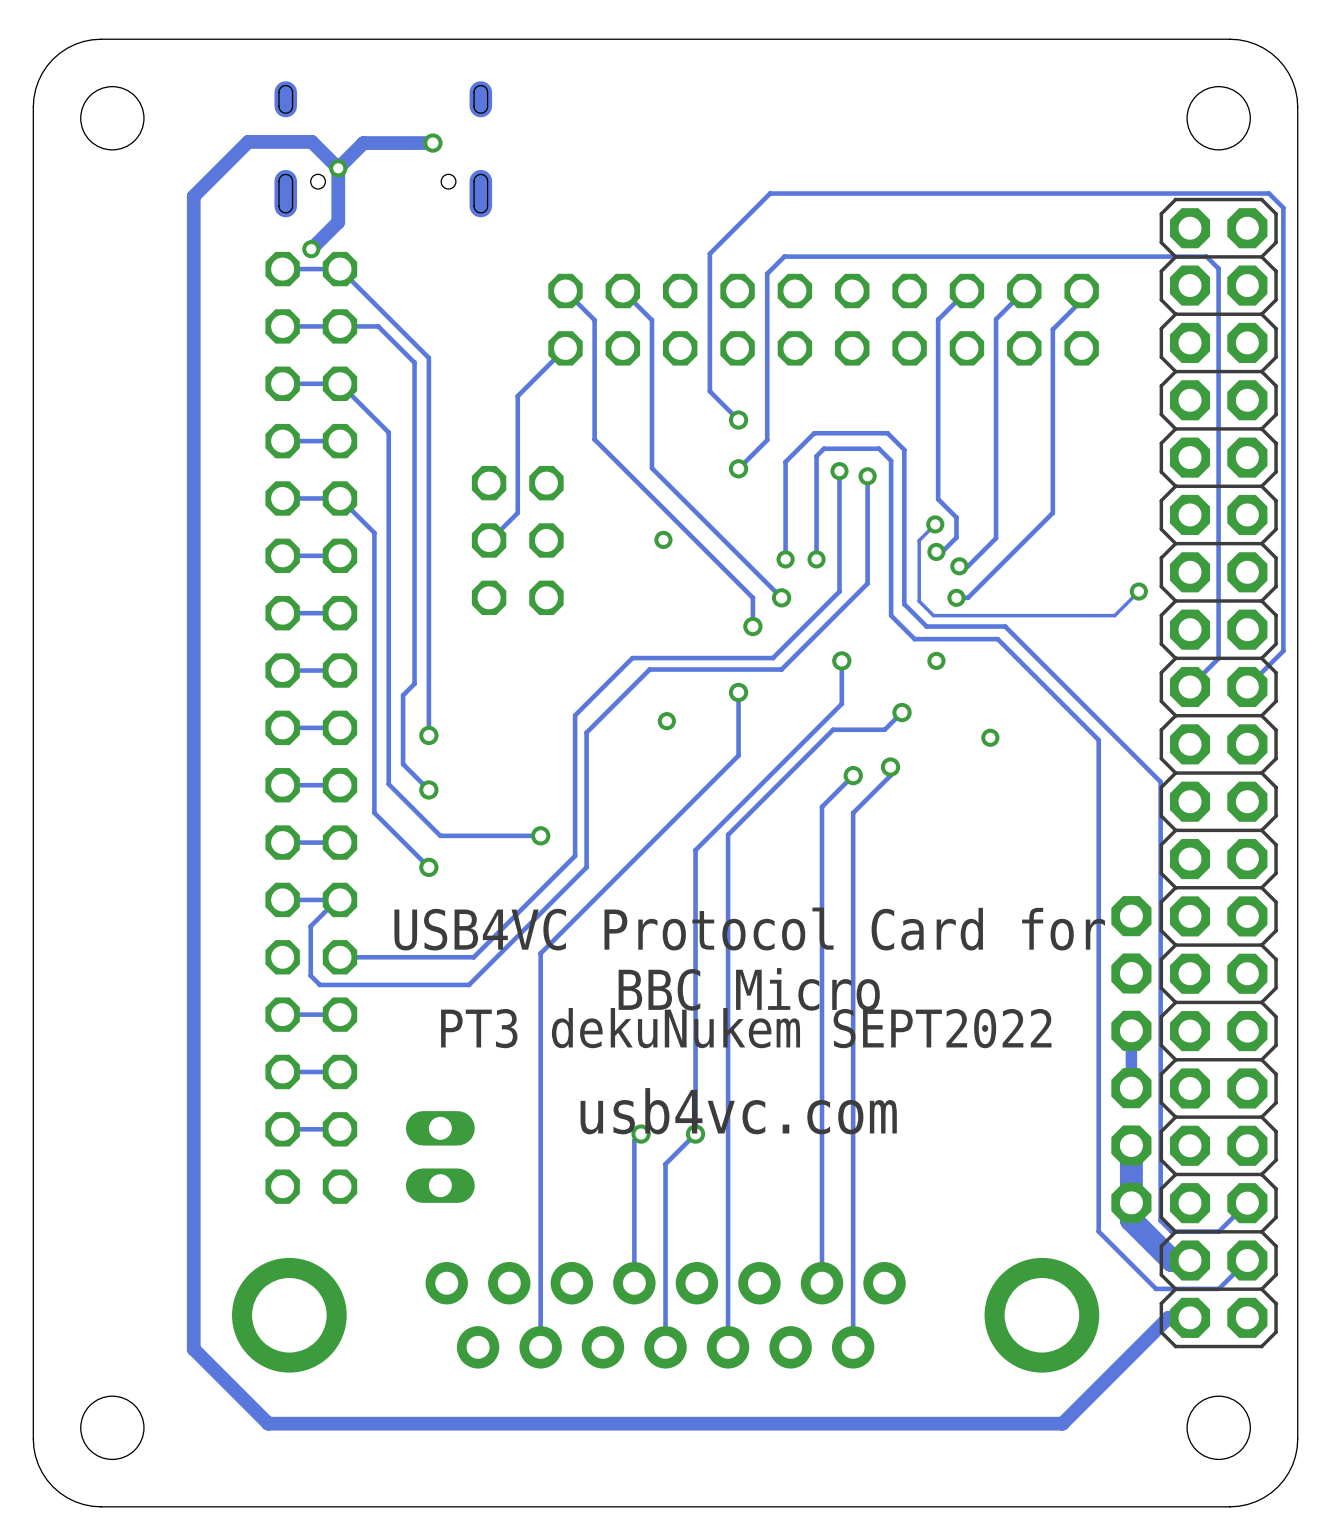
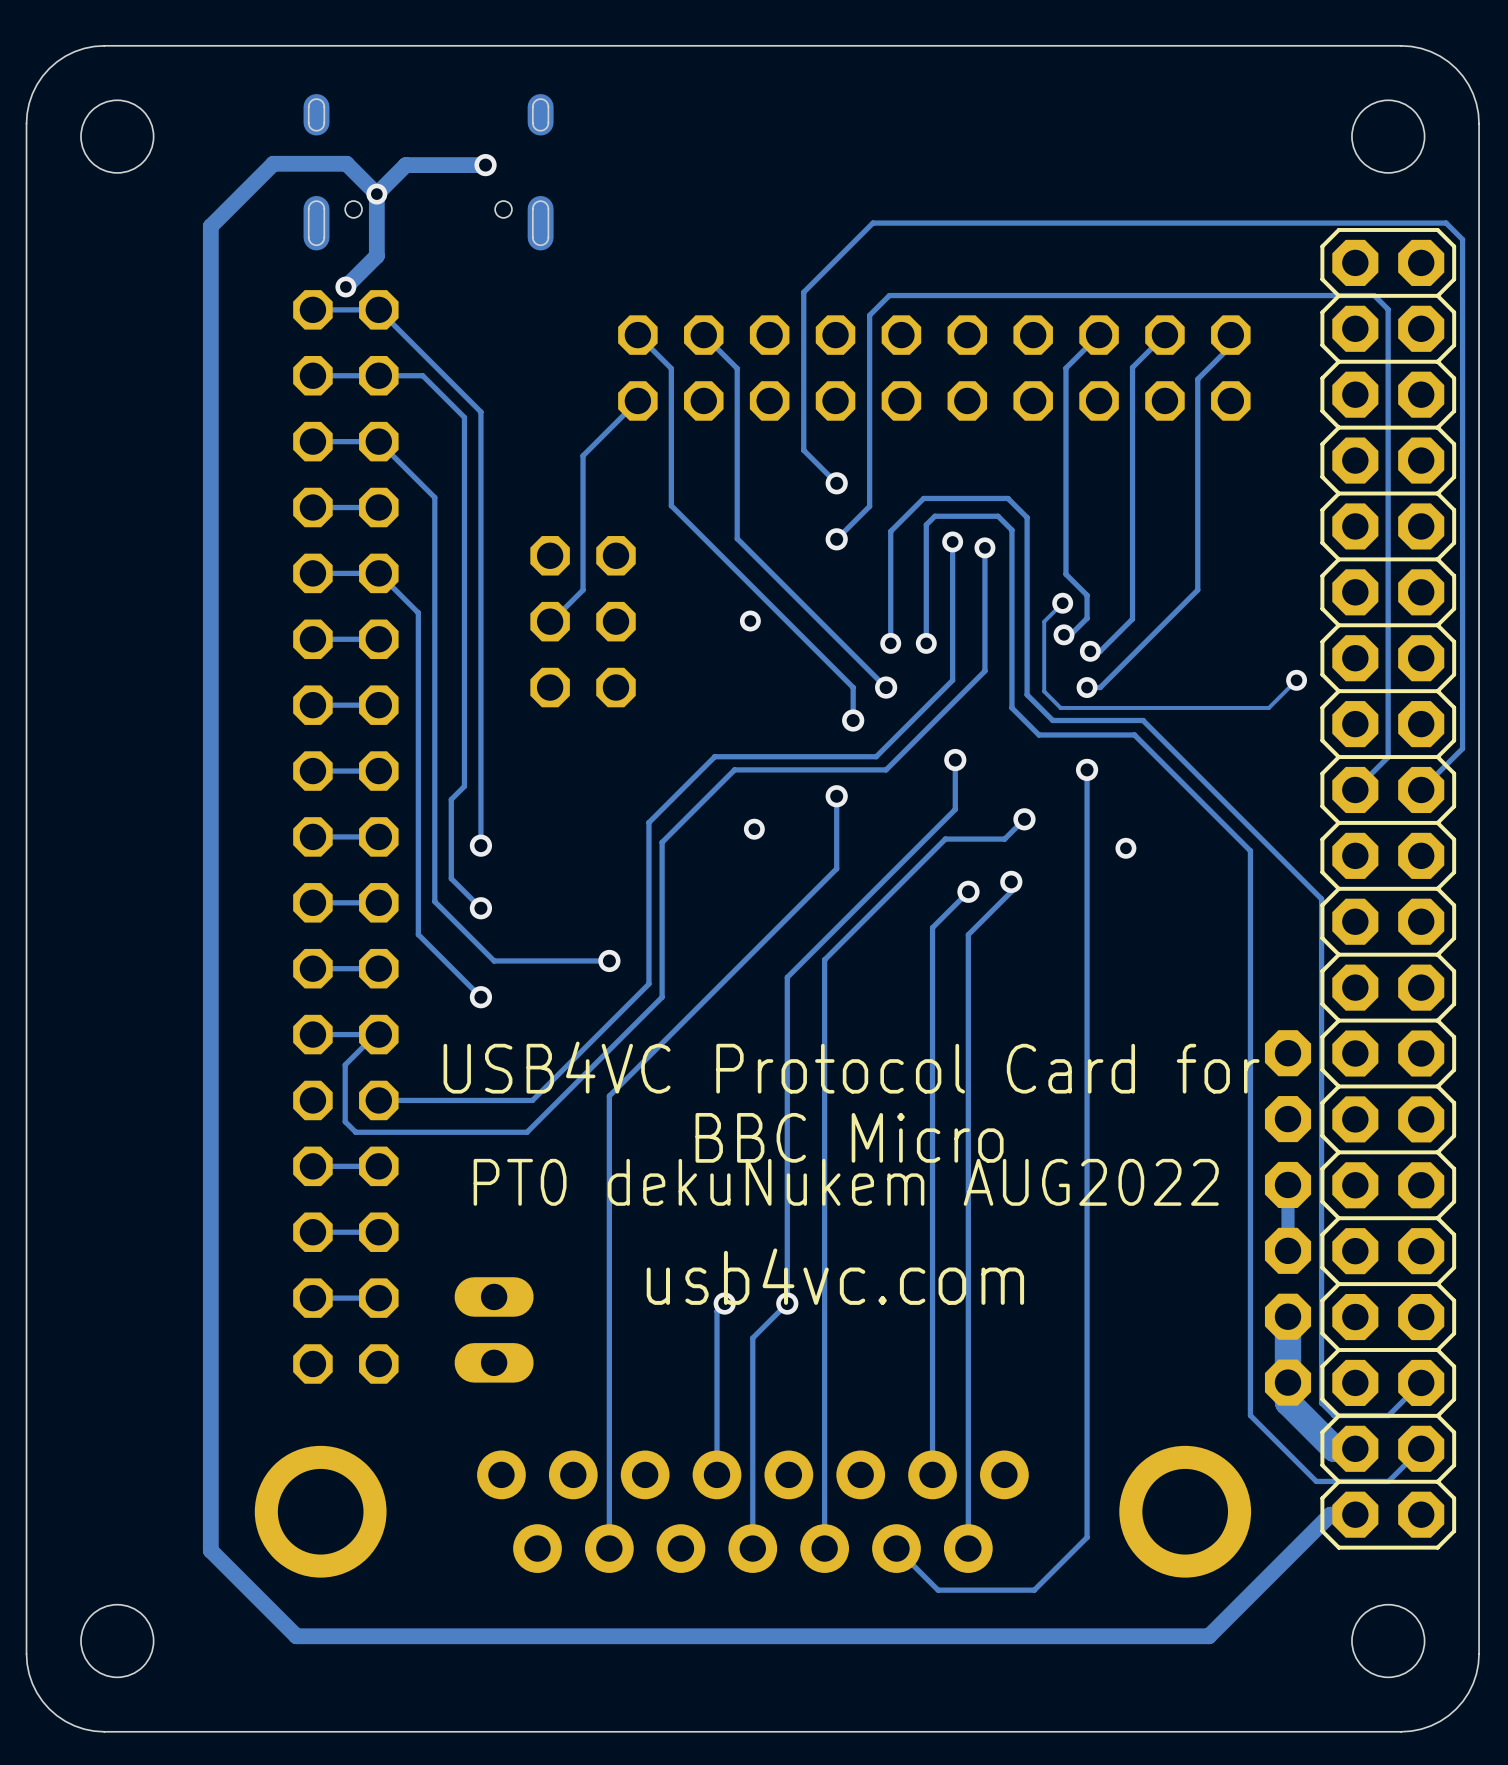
via: (936, 660) -> none
track: none -> (1087, 769) (1087, 1537) (1034, 1590) (938, 1590) (896, 1548)
via: none -> (1087, 769)
text: PT3 dekuNukem SEPT2022 (746, 1028) -> PT0 dekuNukem AUG2022 (846, 1182)

